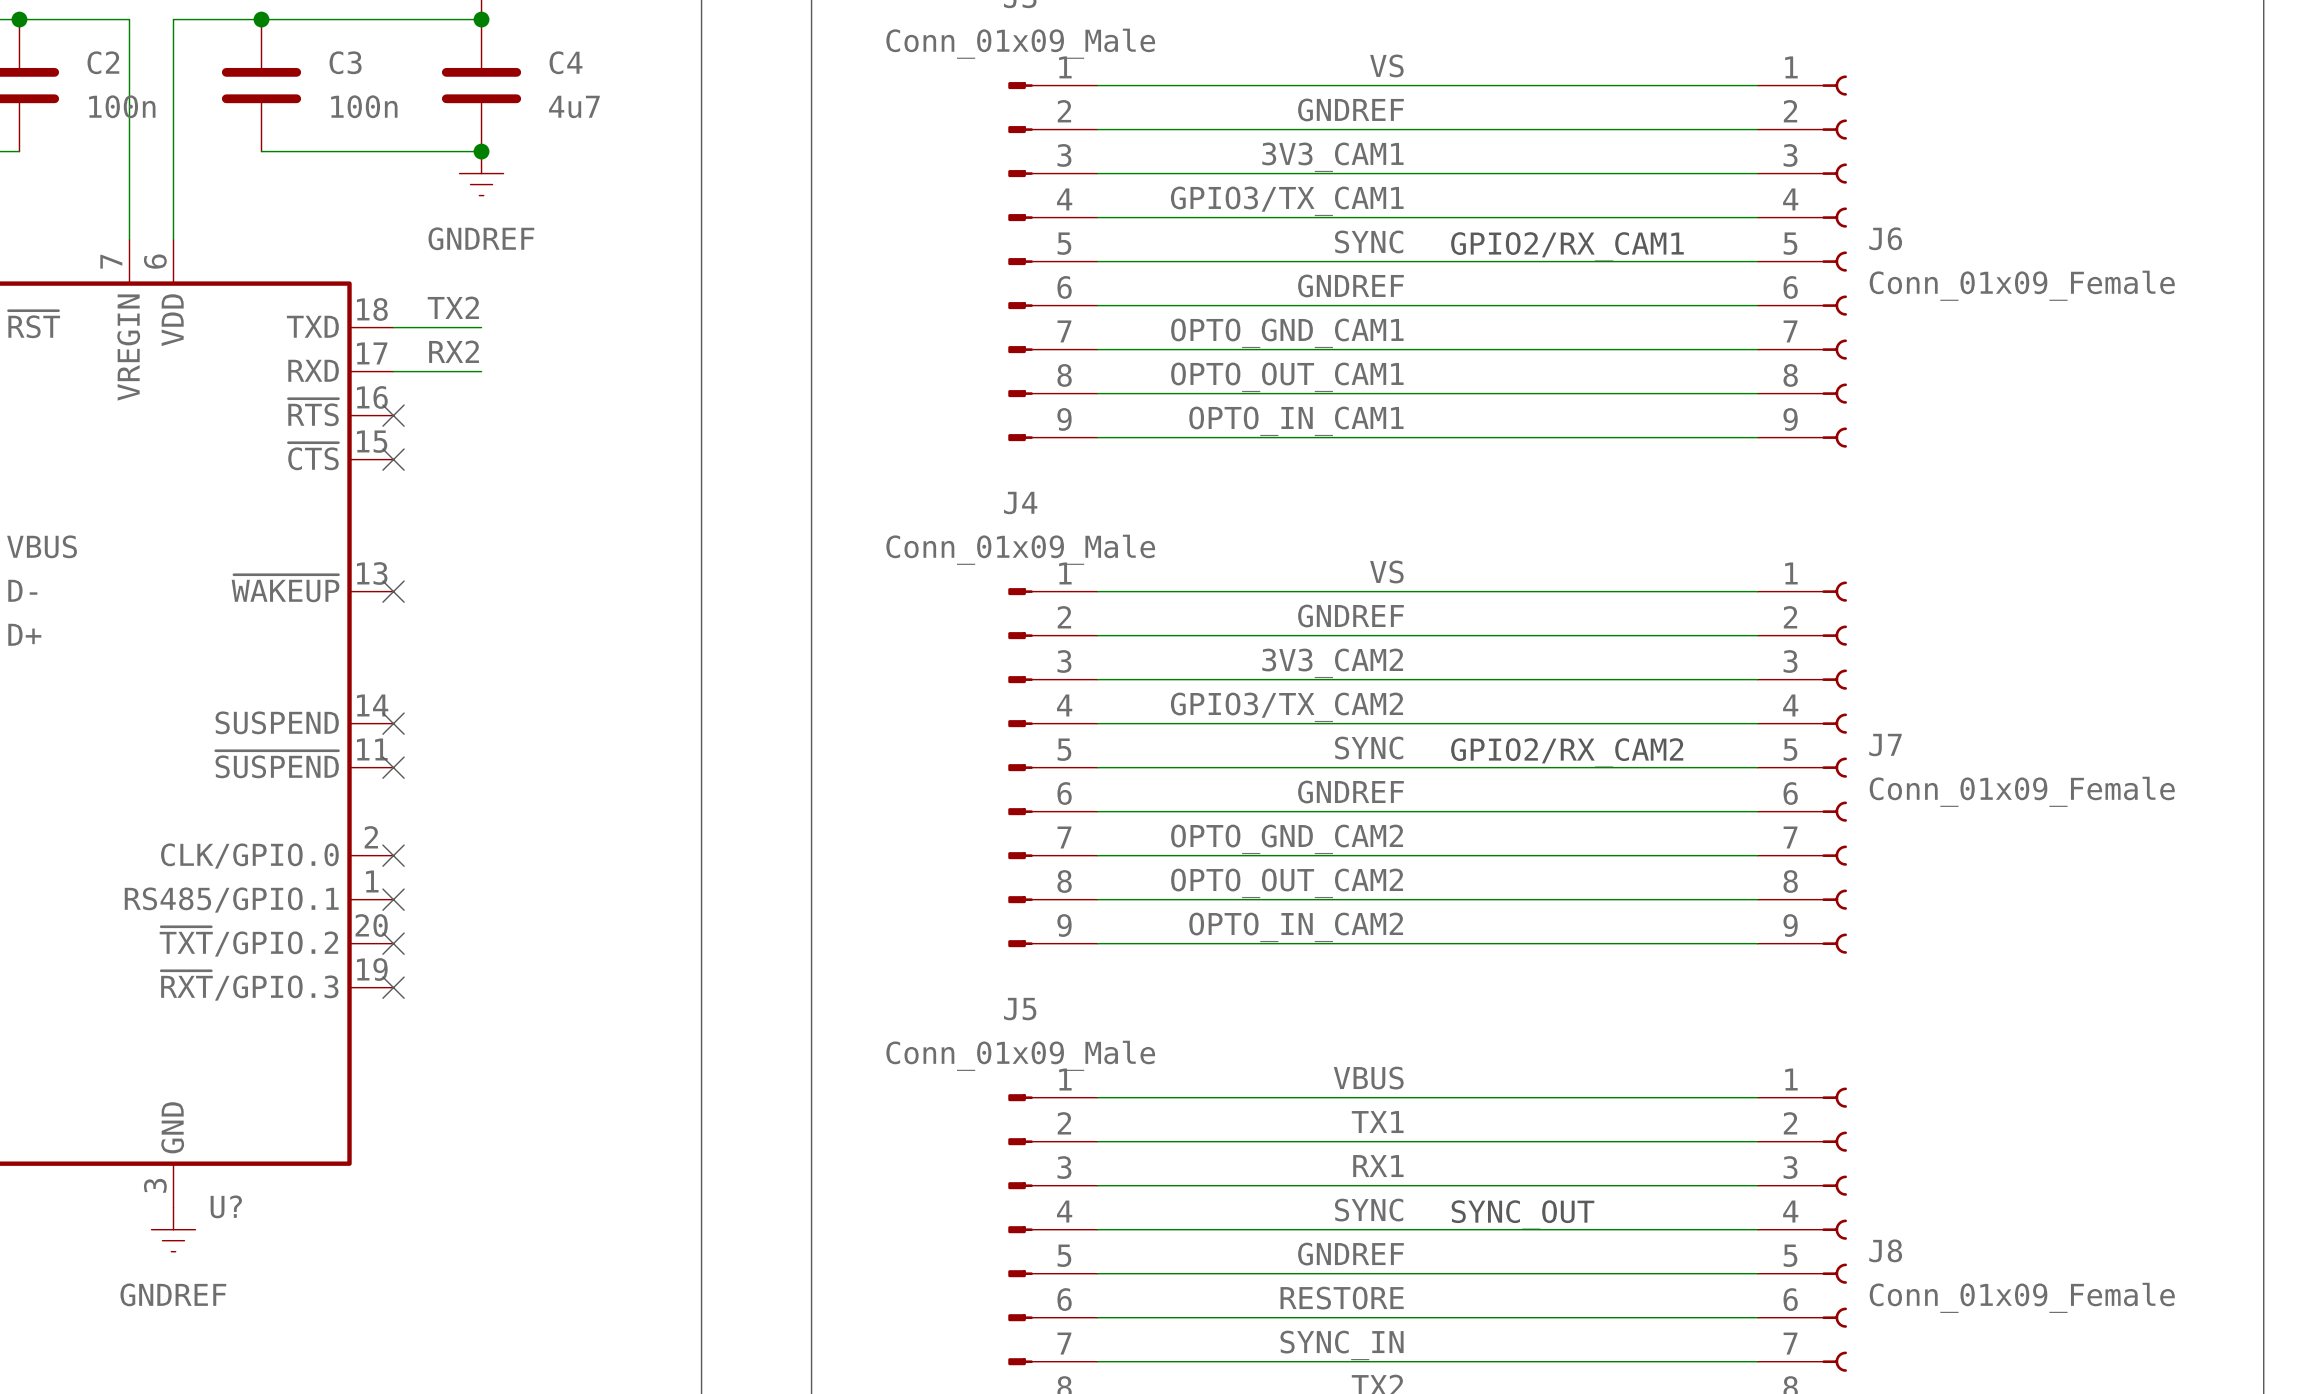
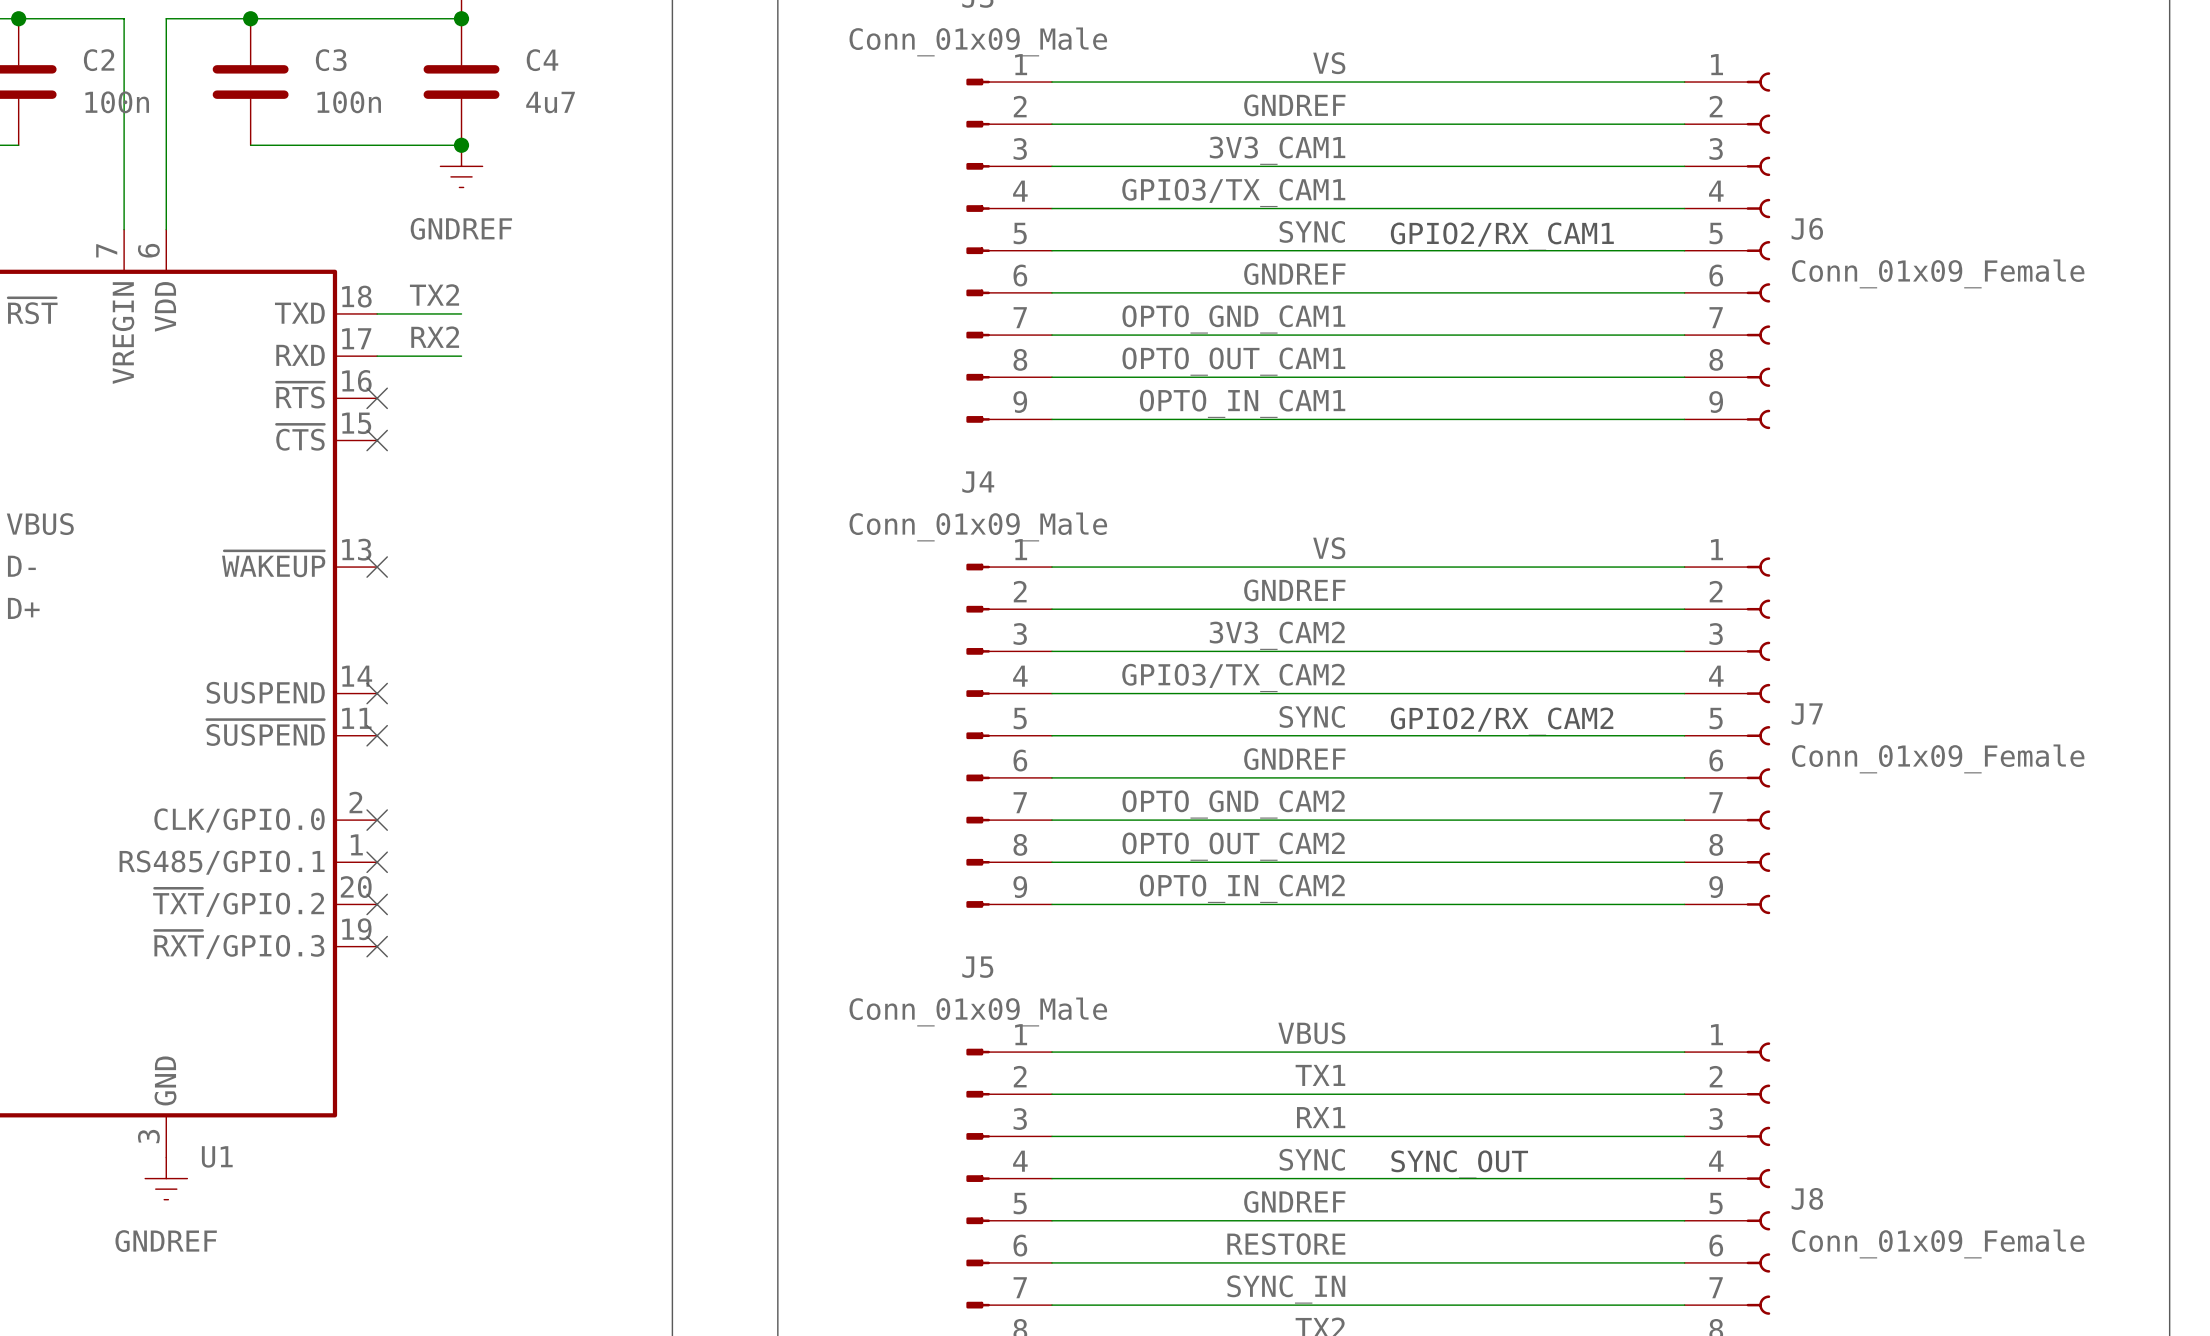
U? name: U? (226, 1206) -> U1 (217, 1156)

